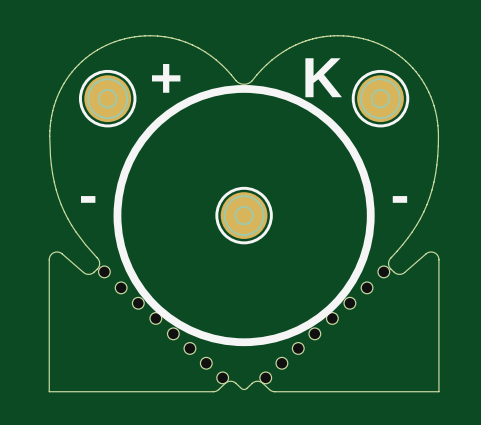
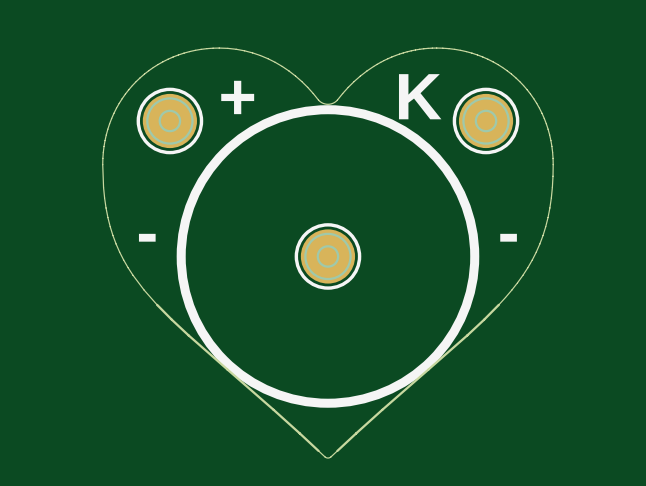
board edge: (97, 258) (98, 267) (88, 274) (84, 273) (60, 252) (54, 252) (49, 256) (49, 391) (213, 391) (227, 381) (235, 383) -> (157, 304) (188, 335) (318, 450)
board edge: (390, 258) (389, 267) (399, 274) (403, 273) (427, 252) (434, 252) (438, 256) (438, 391) (274, 391) (260, 381) (252, 383) -> (498, 304) (467, 335) (337, 450)
part: (104, 271) -> none
part: (383, 271) -> none
part: (121, 287) -> none
part: (367, 287) -> none
part: (138, 303) -> none
part: (349, 303) -> none
part: (155, 318) -> none
part: (332, 318) -> none
part: (173, 333) -> none
part: (314, 333) -> none
part: (189, 348) -> none
part: (298, 348) -> none
part: (206, 363) -> none
part: (281, 363) -> none
part: (222, 377) -> none
part: (265, 377) -> none

